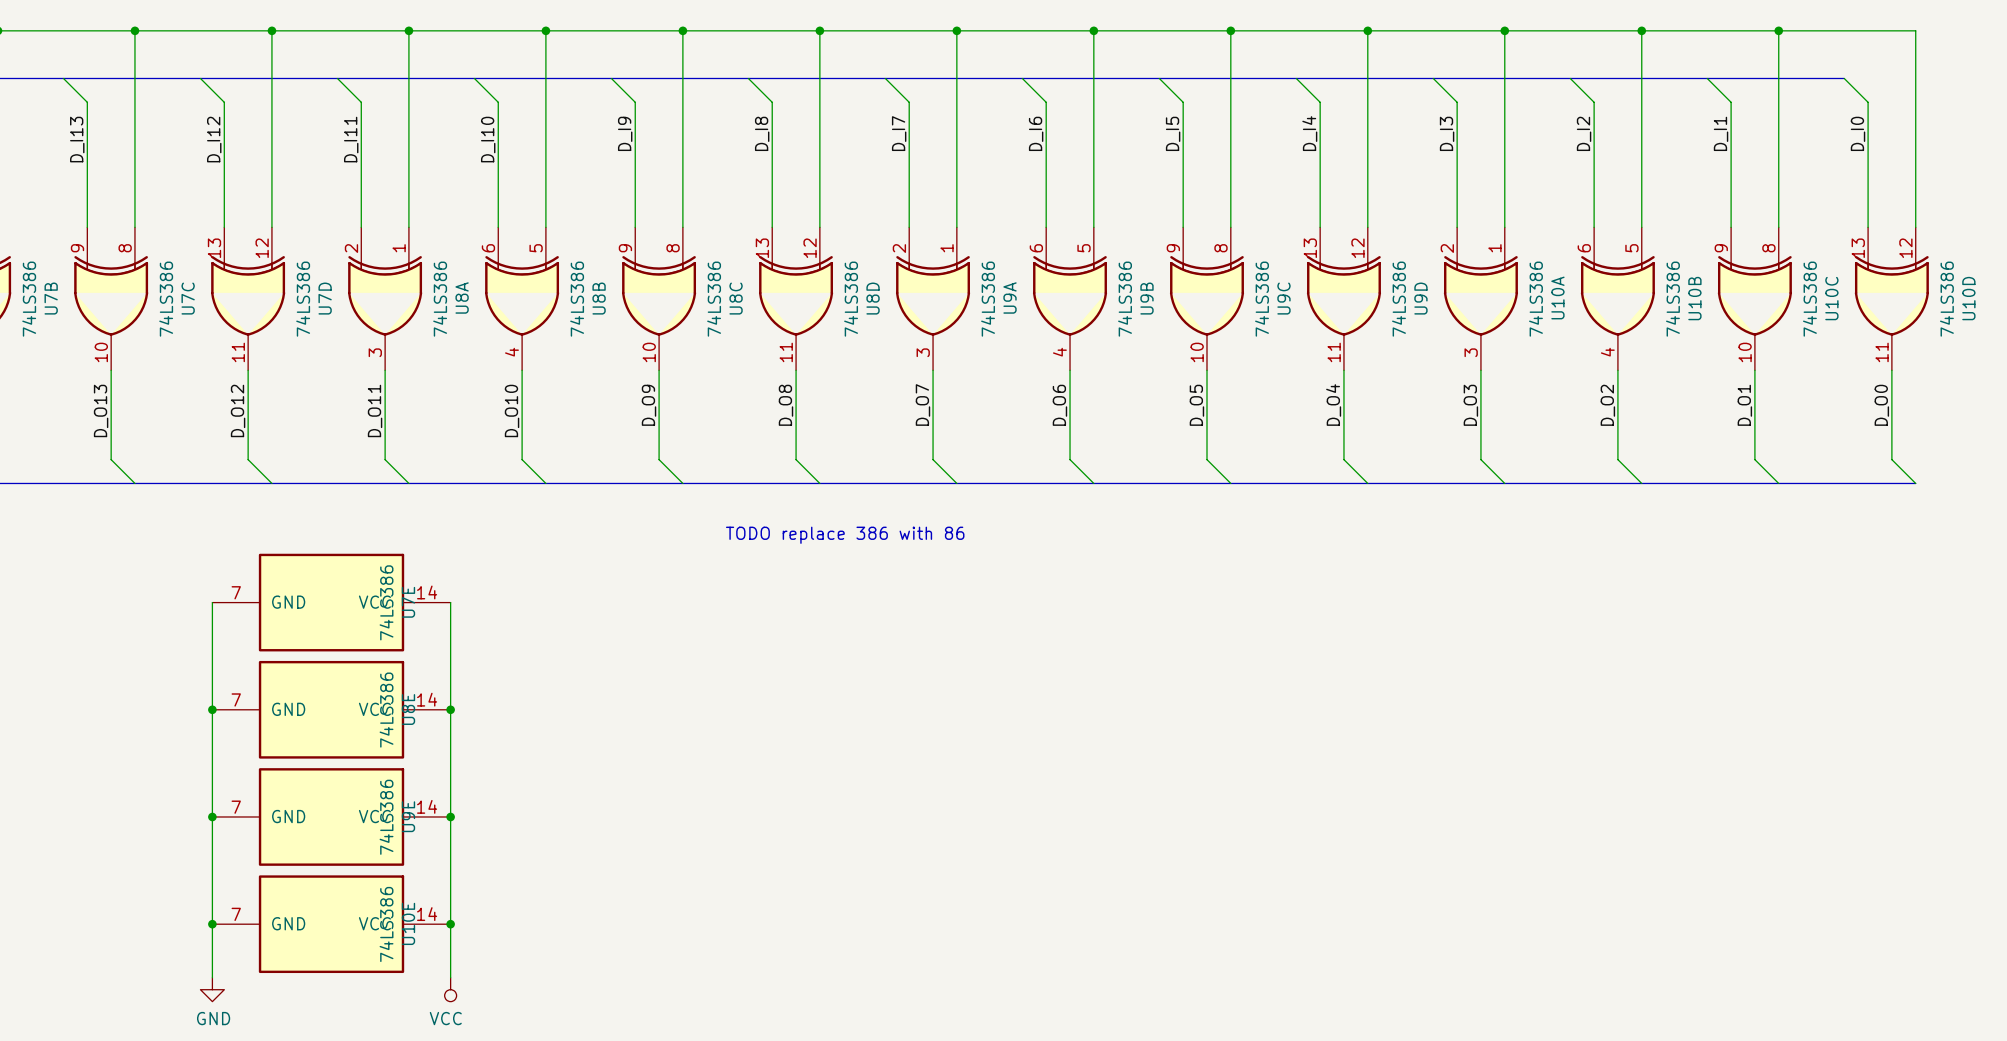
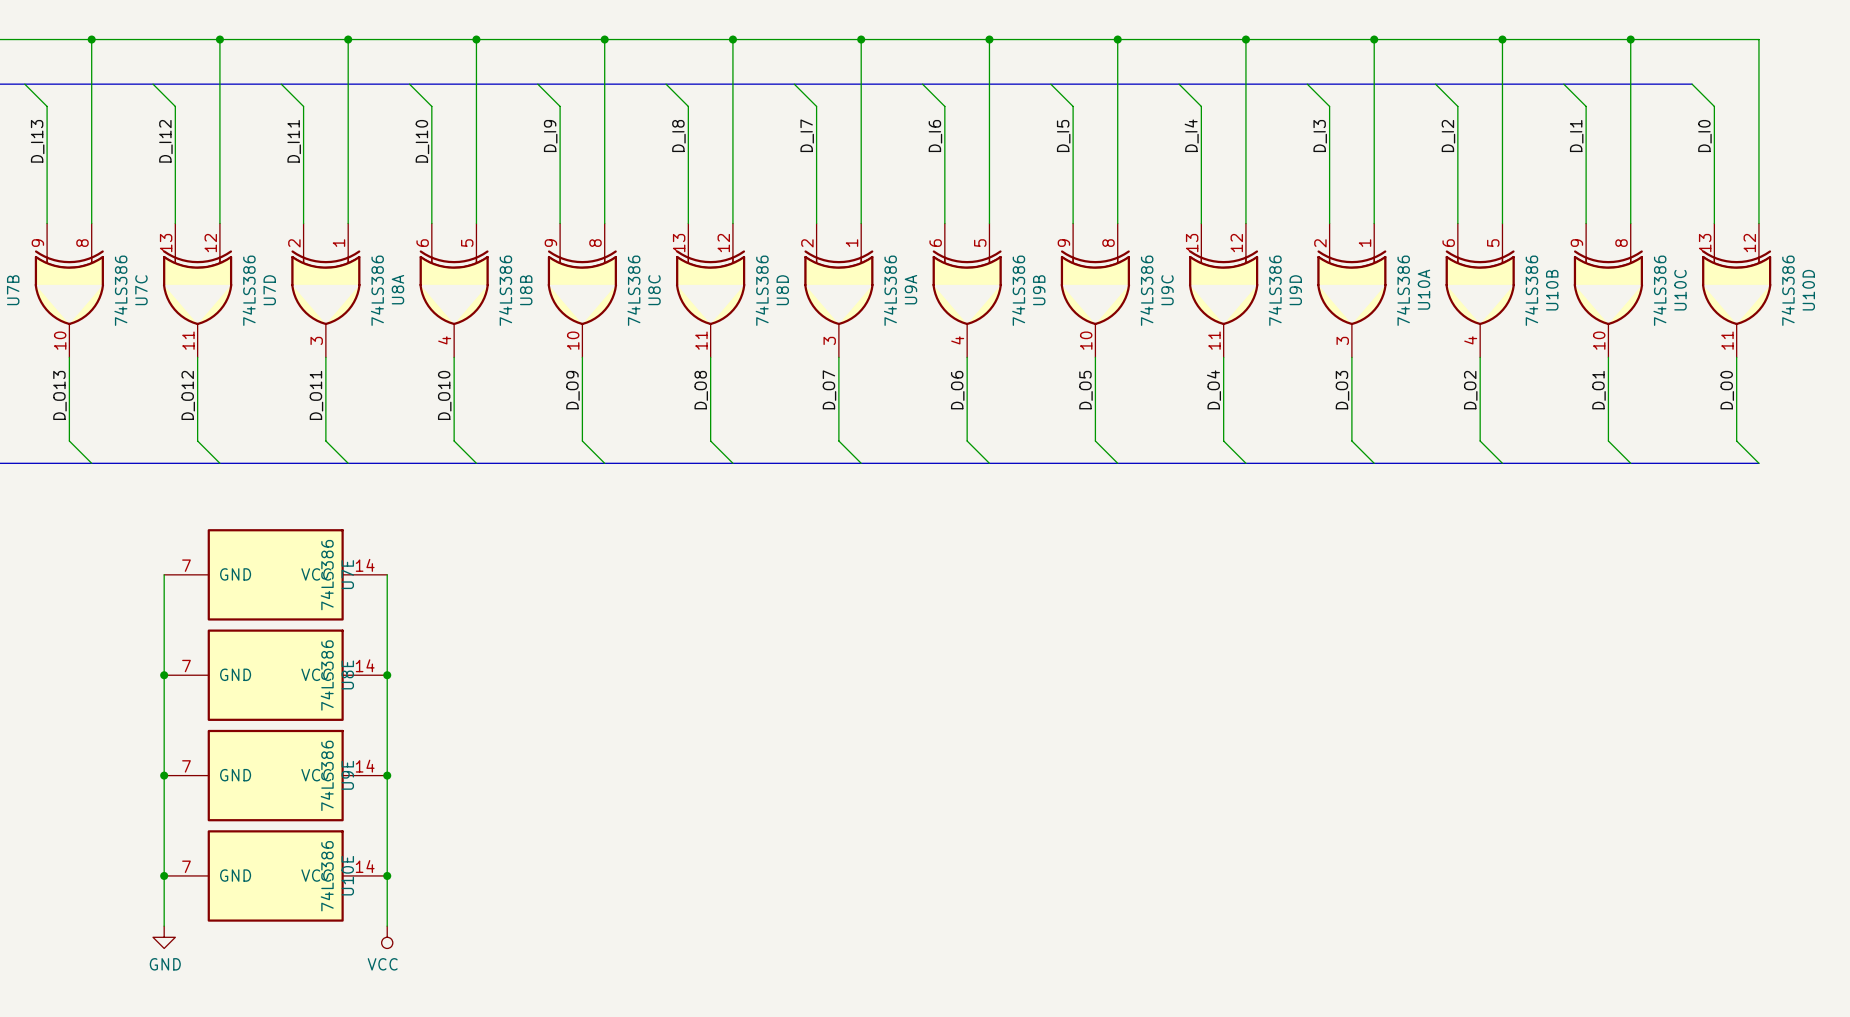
text: TODO replace 386 with 86 (845, 535) -> none

